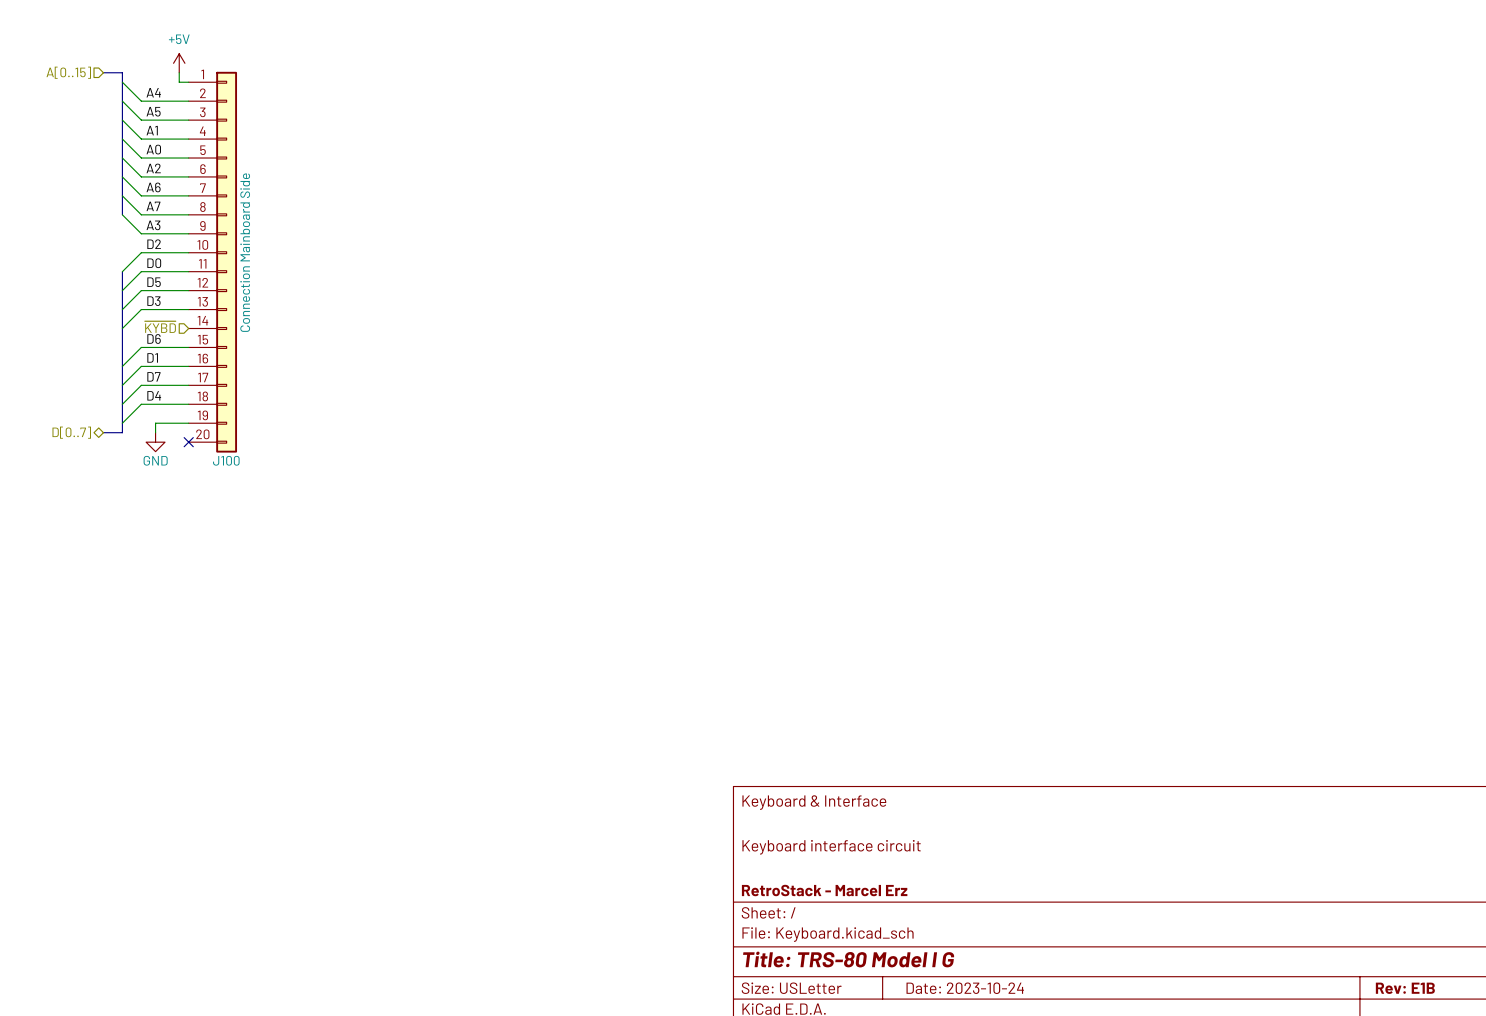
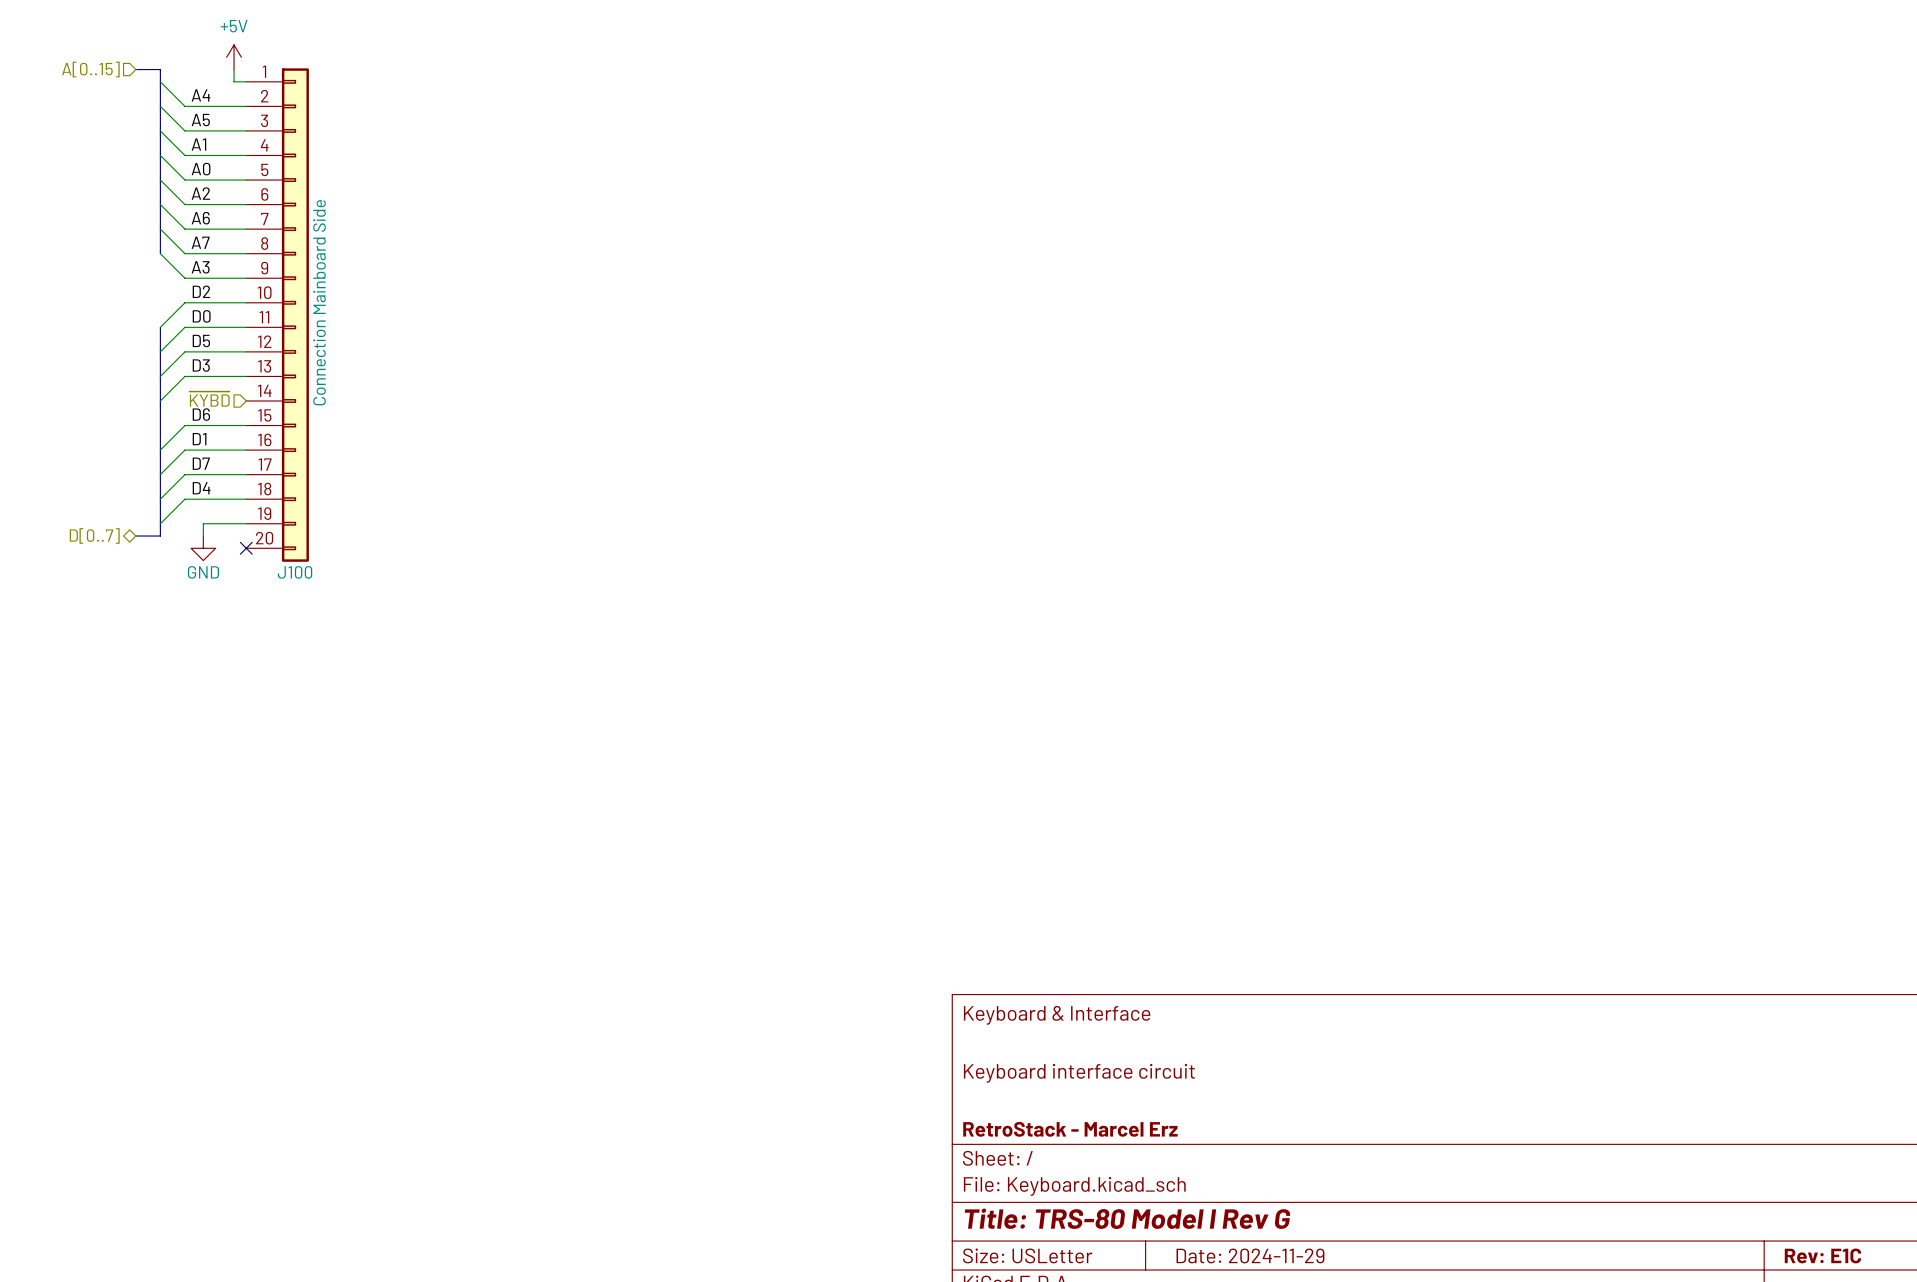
title block: Title: TRS-80 Model I G (848, 959) -> Title: TRS-80 Model I Rev G (1127, 1218)
title block: Date: 2023-10-24 (965, 988) -> Date: 2024-11-29 (1250, 1255)
title block: Rev: E1B (1405, 988) -> Rev: E1C (1822, 1255)

